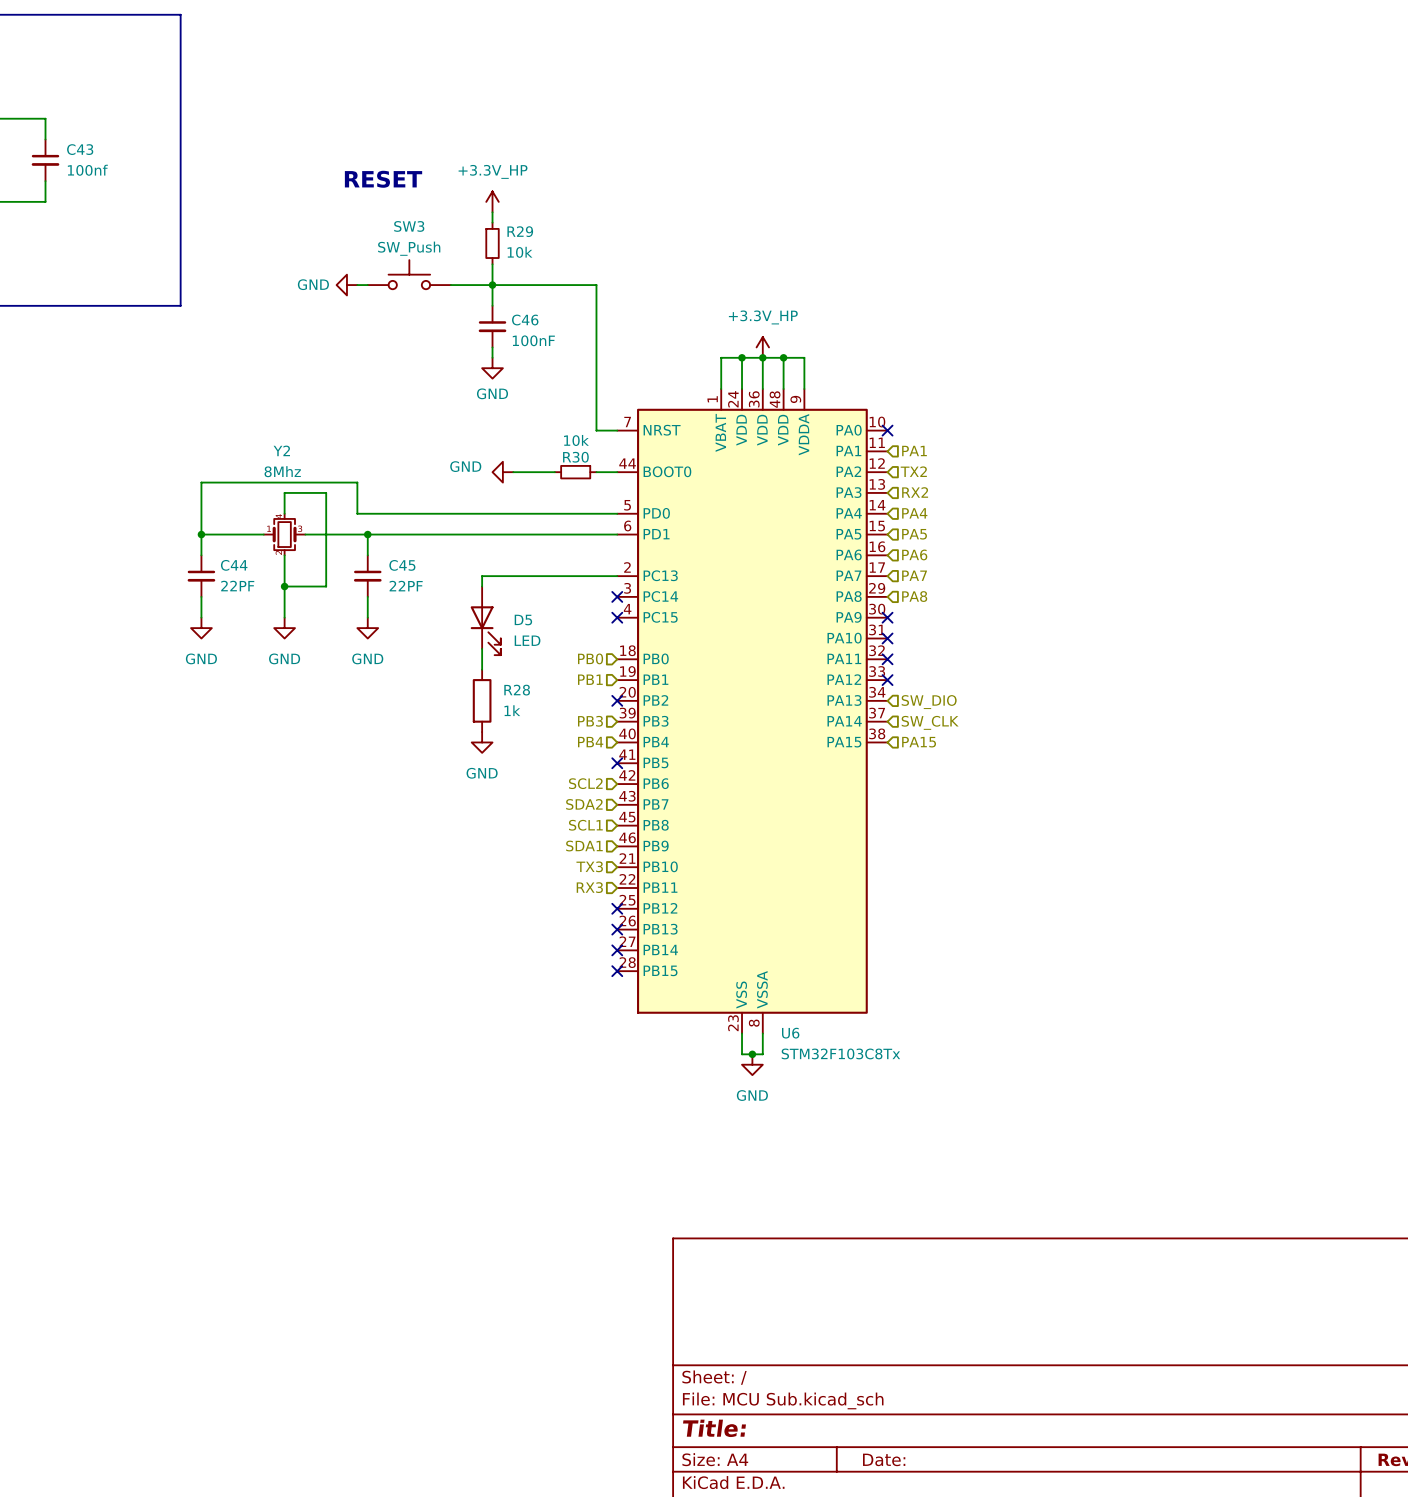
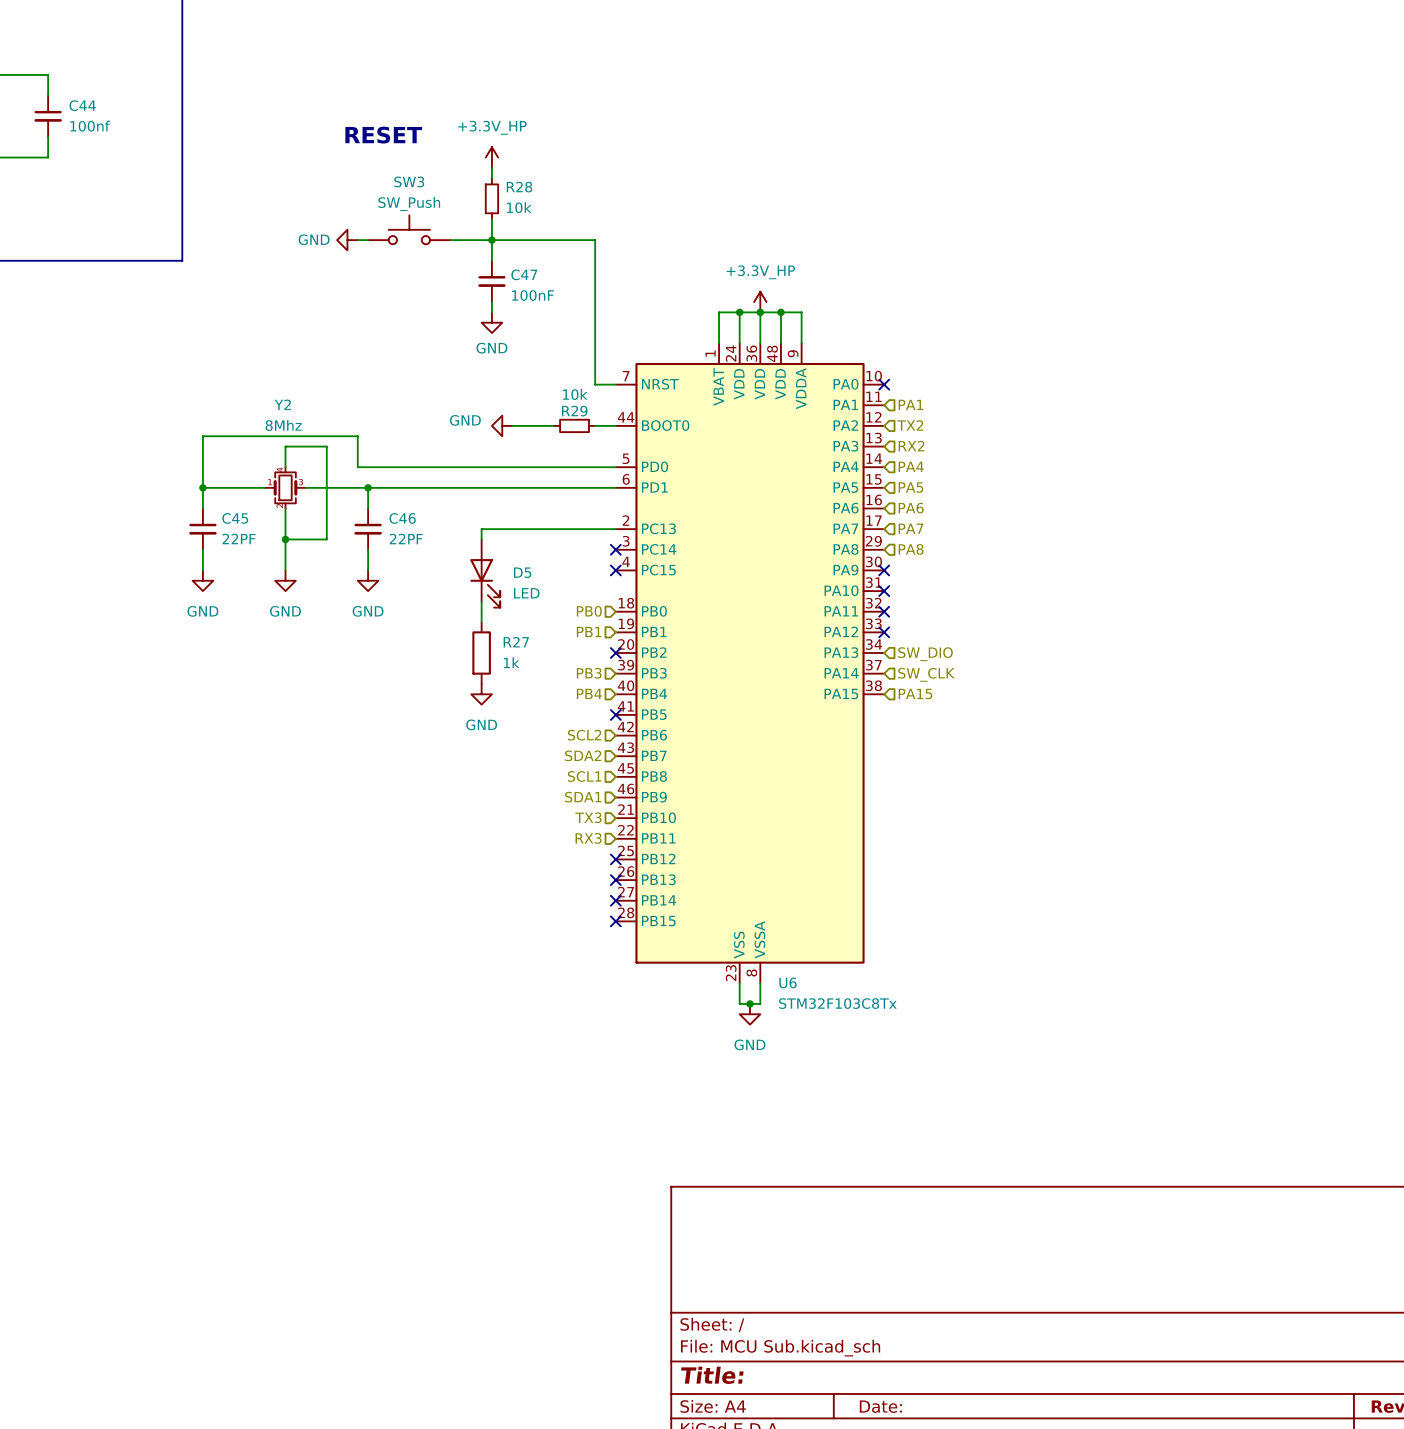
C43 name: C43 (80, 149) -> C44 (82, 105)
R29 name: R29 (520, 231) -> R28 (519, 187)
C46 name: C46 (525, 320) -> C47 (524, 274)
R30 name: R30 (575, 457) -> R29 (574, 411)
C44 name: C44 (234, 565) -> C45 (235, 518)
C45 name: C45 (402, 565) -> C46 (402, 518)
R28 name: R28 (517, 690) -> R27 (516, 642)

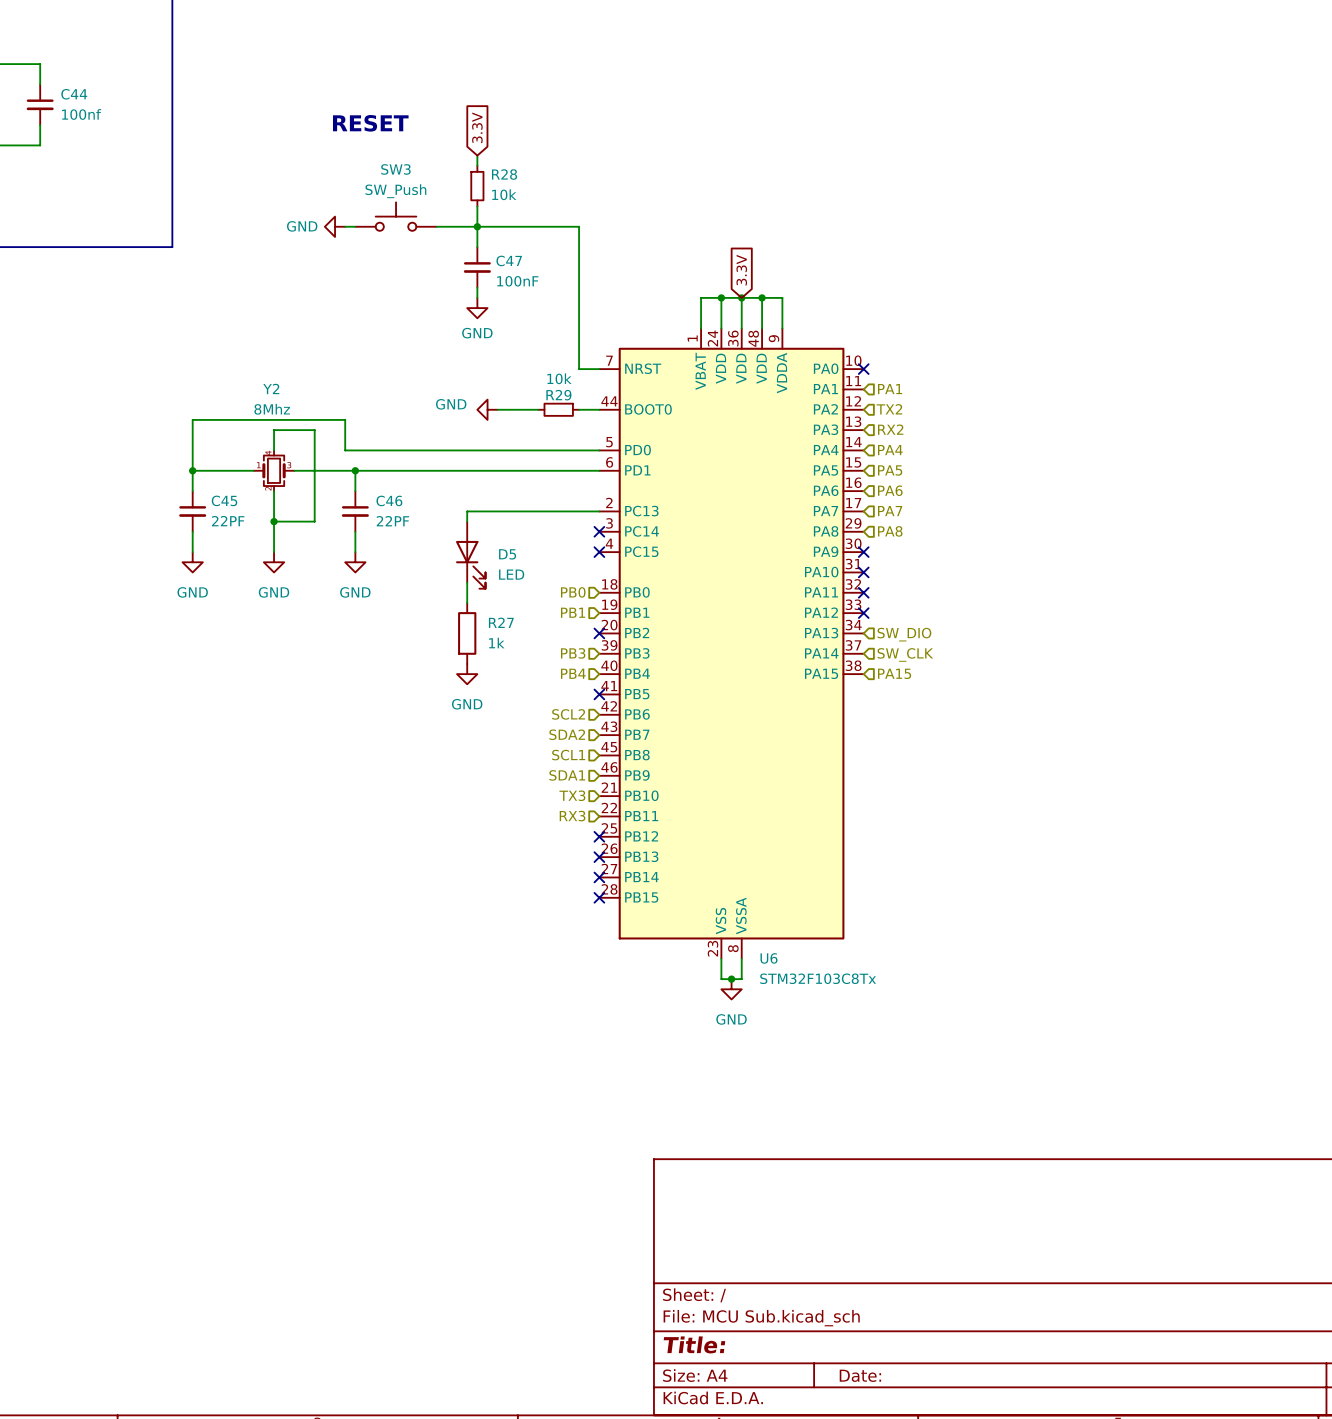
global label: none -> 3.3V (477, 127)
power symbol: +3.3V_HP (491, 157) -> none
global label: none -> 3.3V (741, 270)
power symbol: +3.3V_HP (760, 302) -> none

